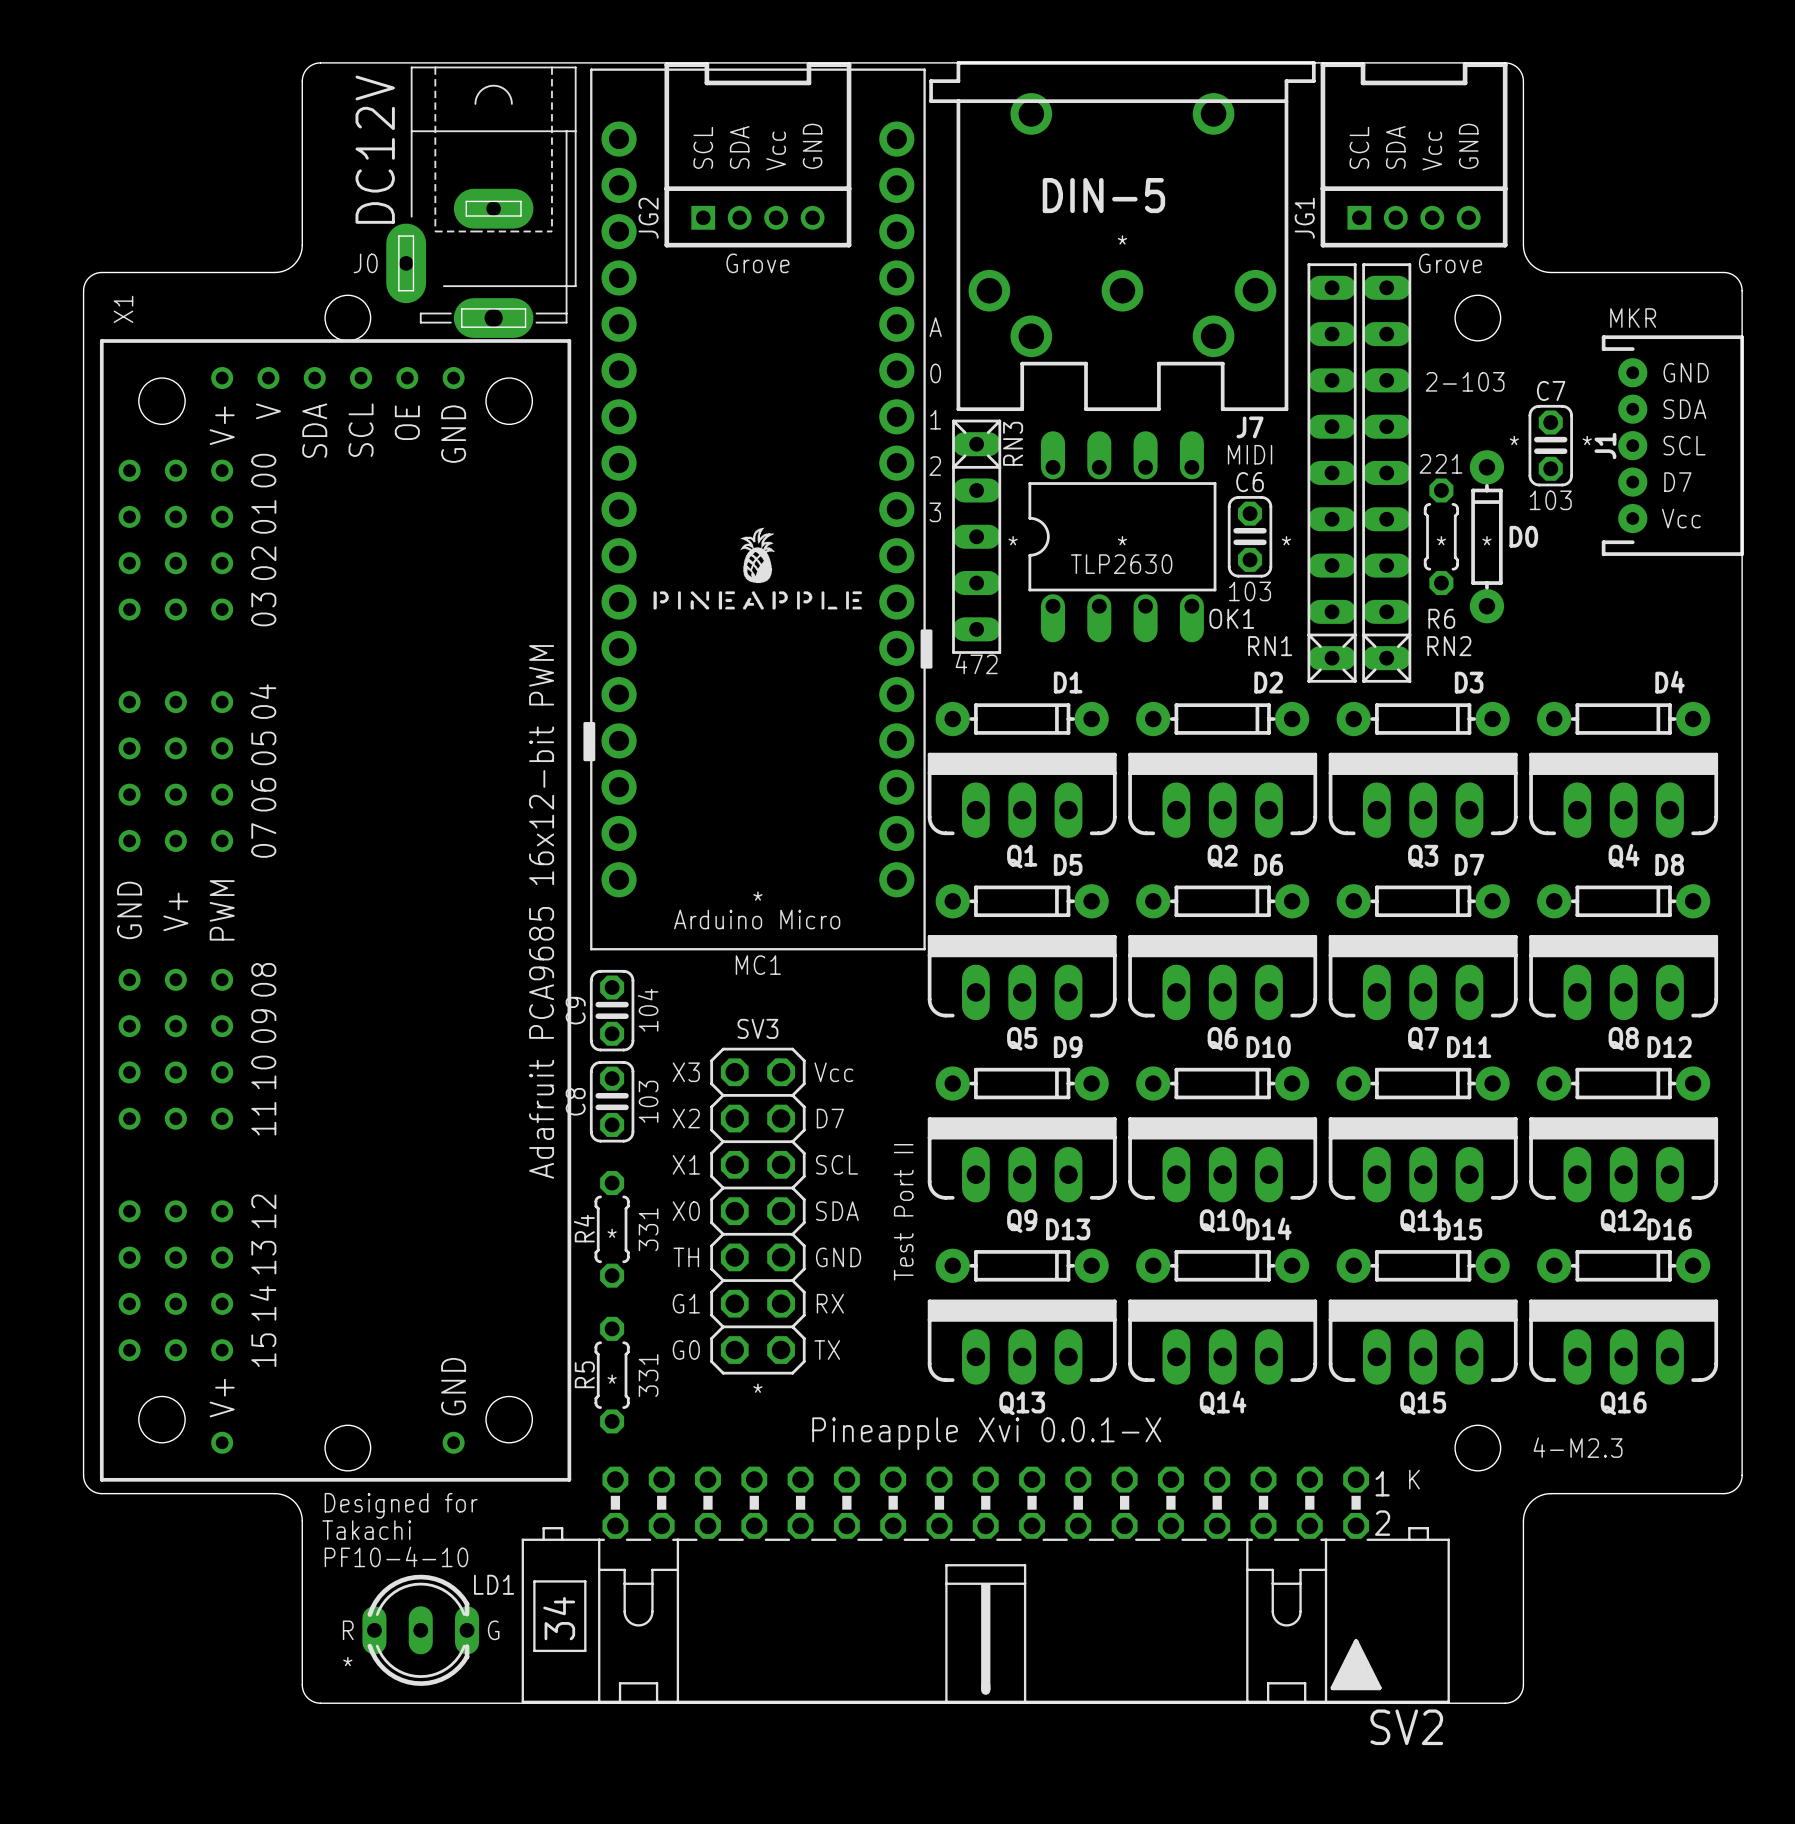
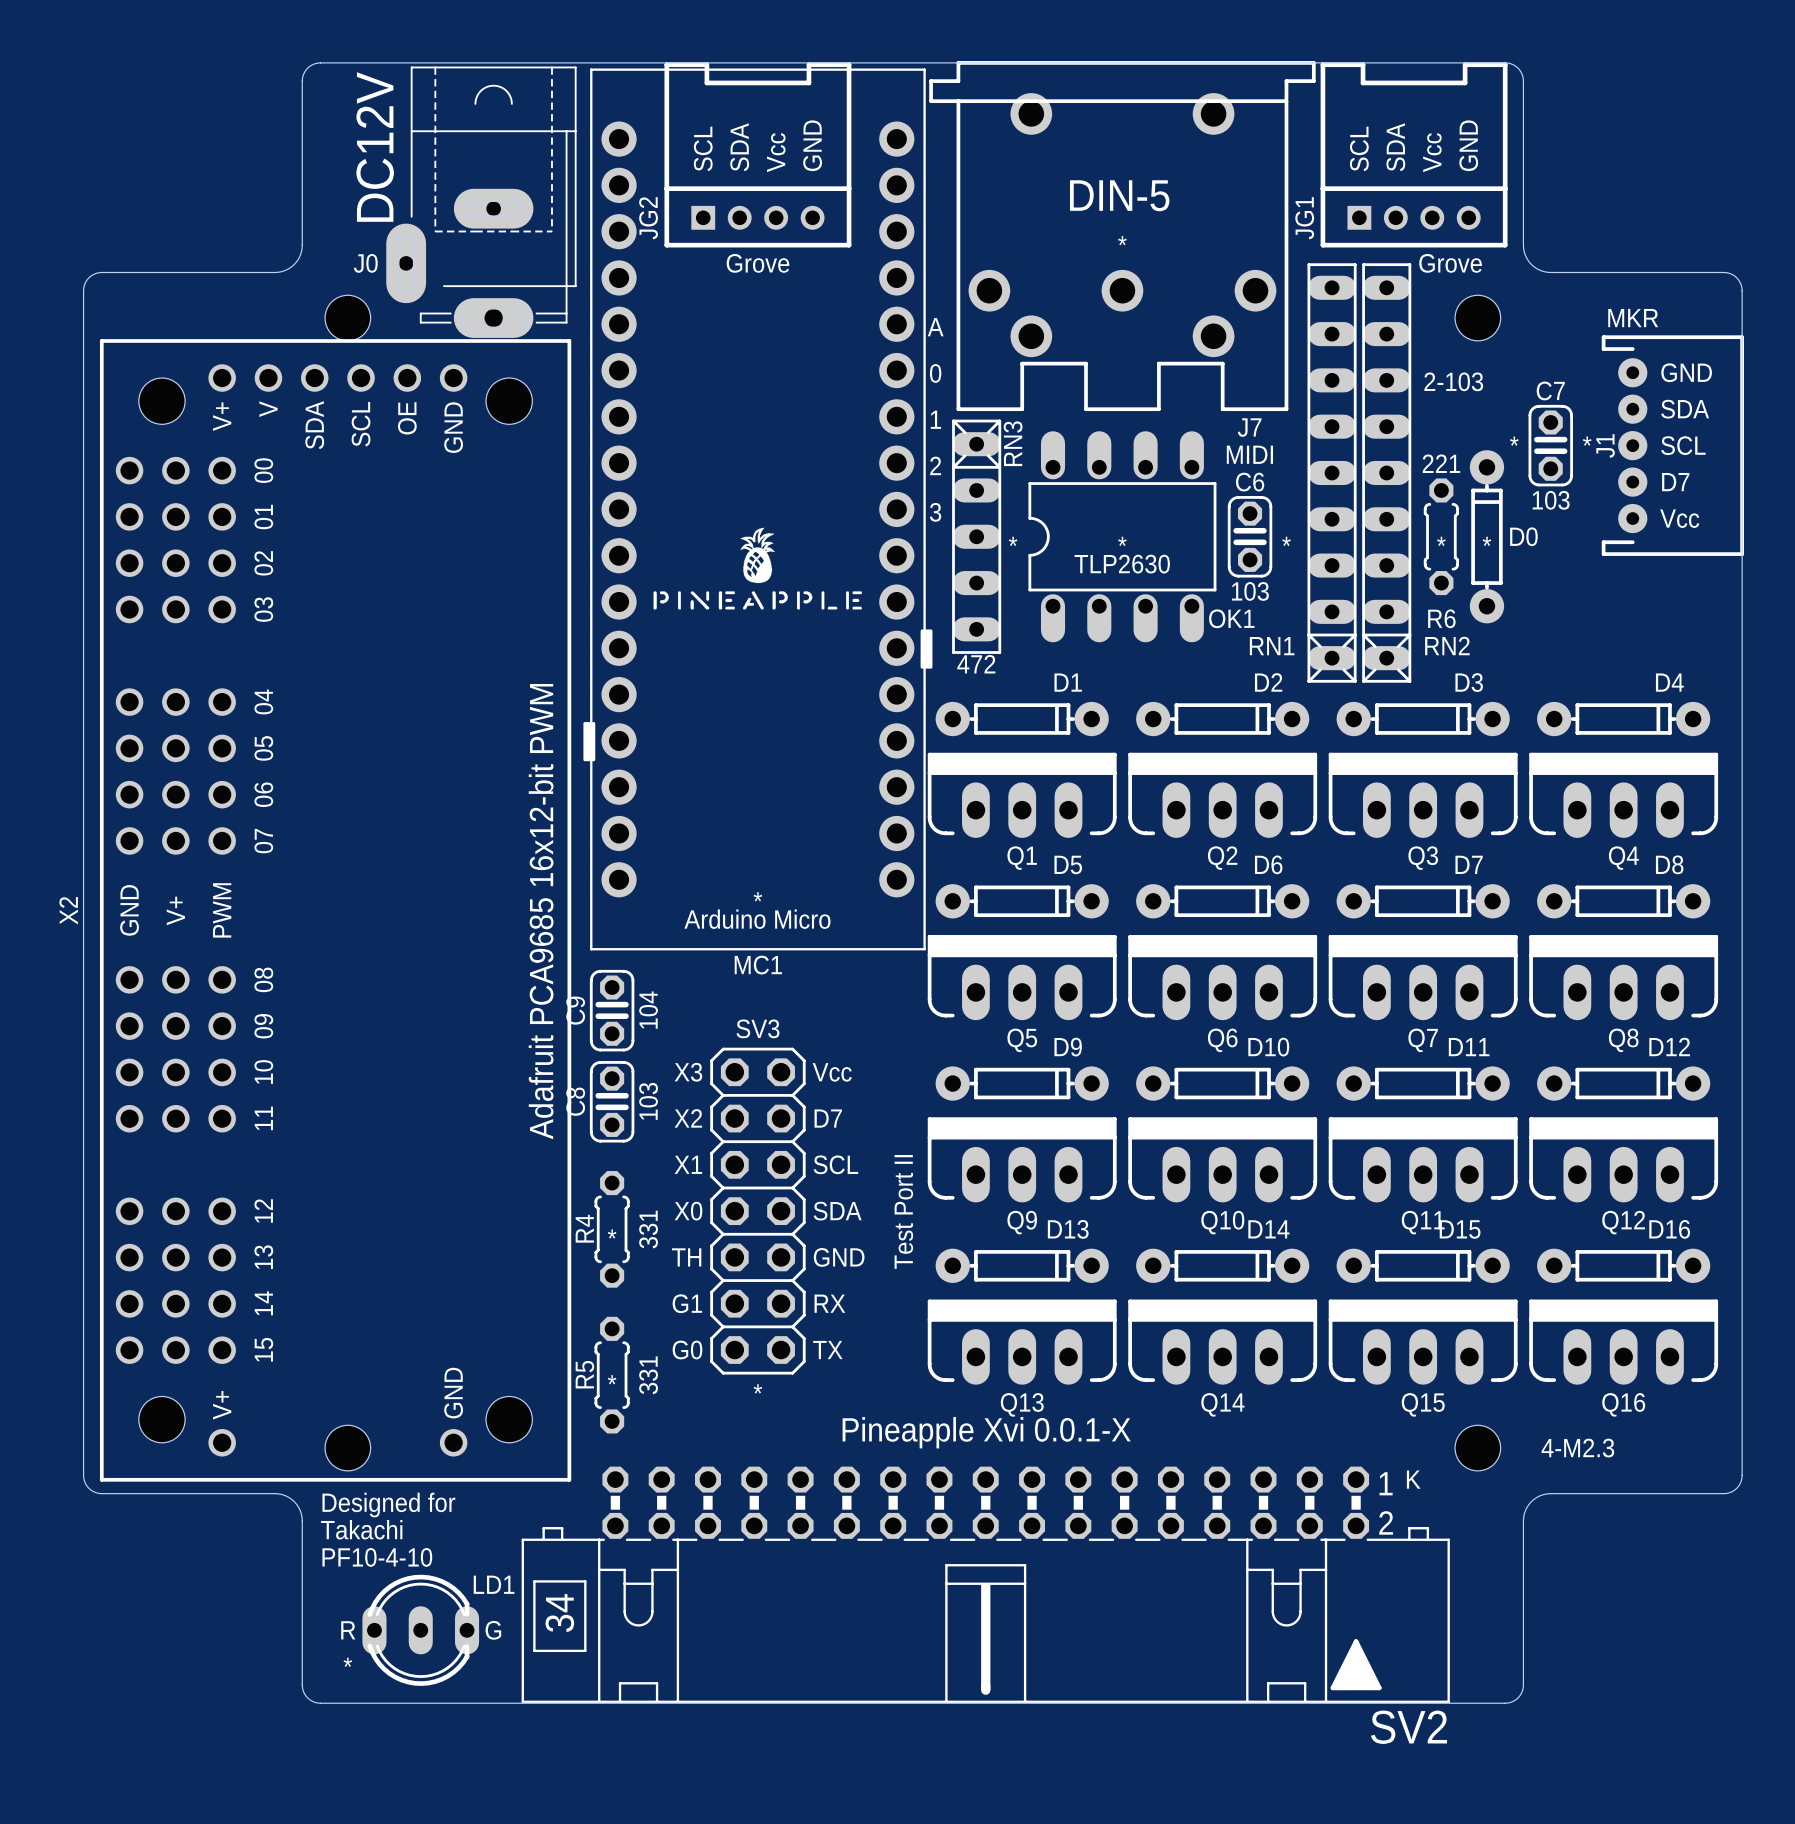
X1: (335, 910) -> none
X2: none -> (335, 910)

